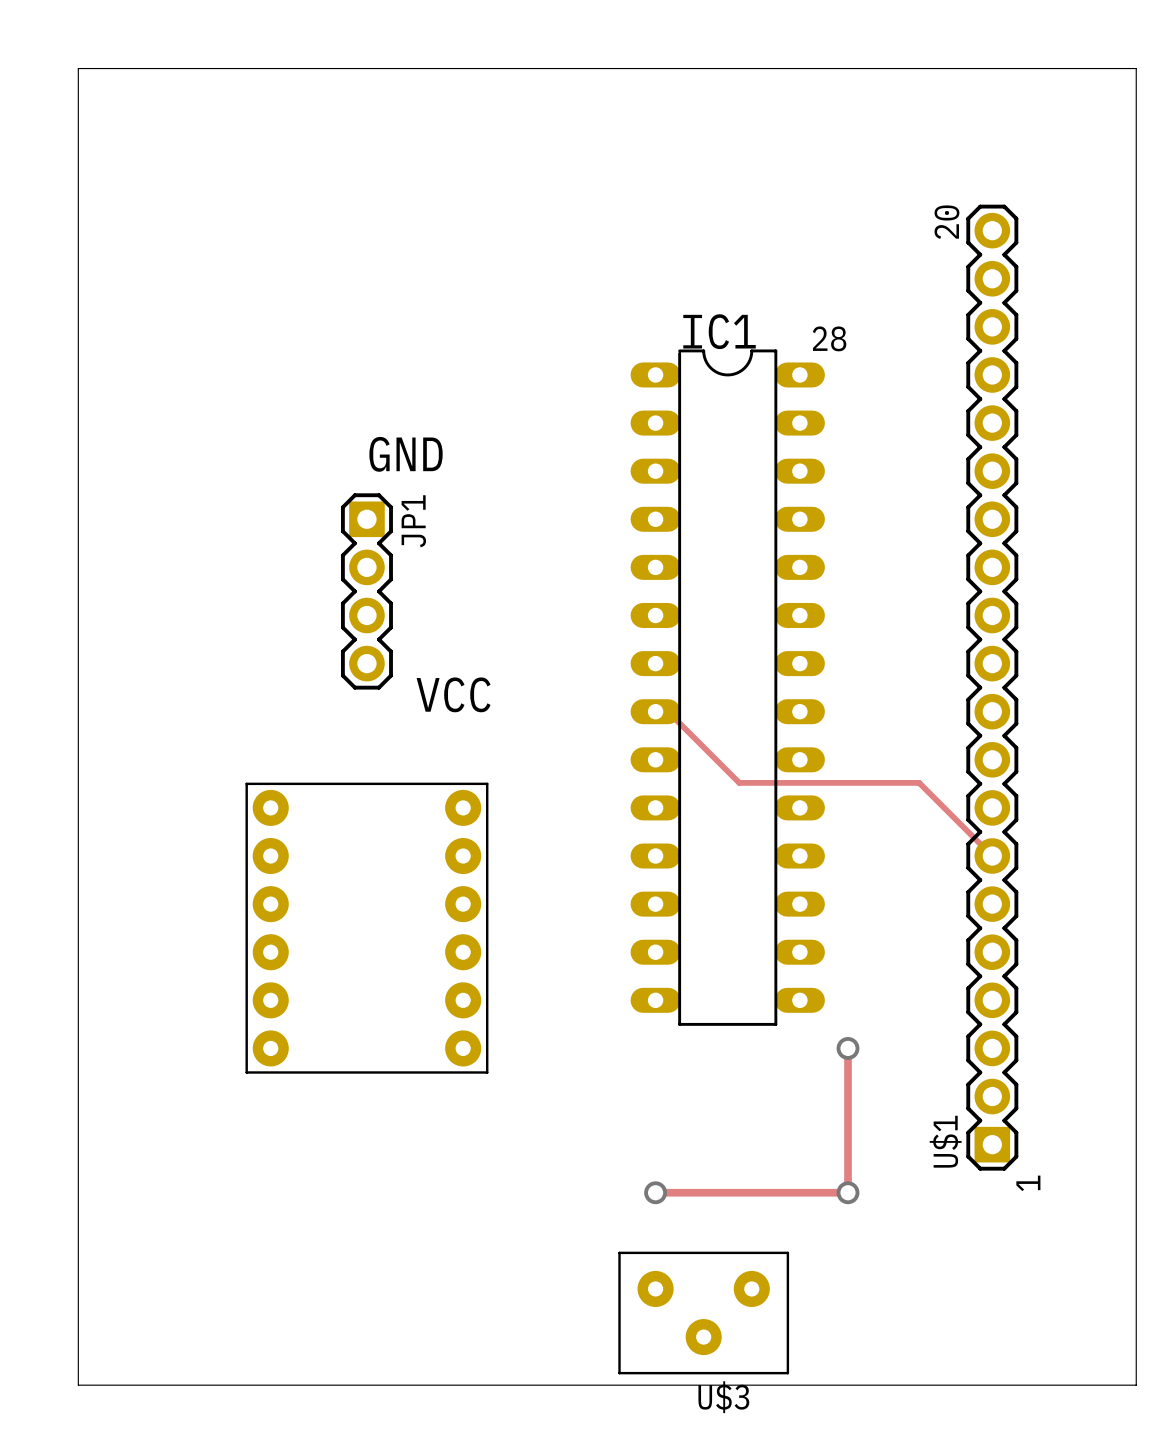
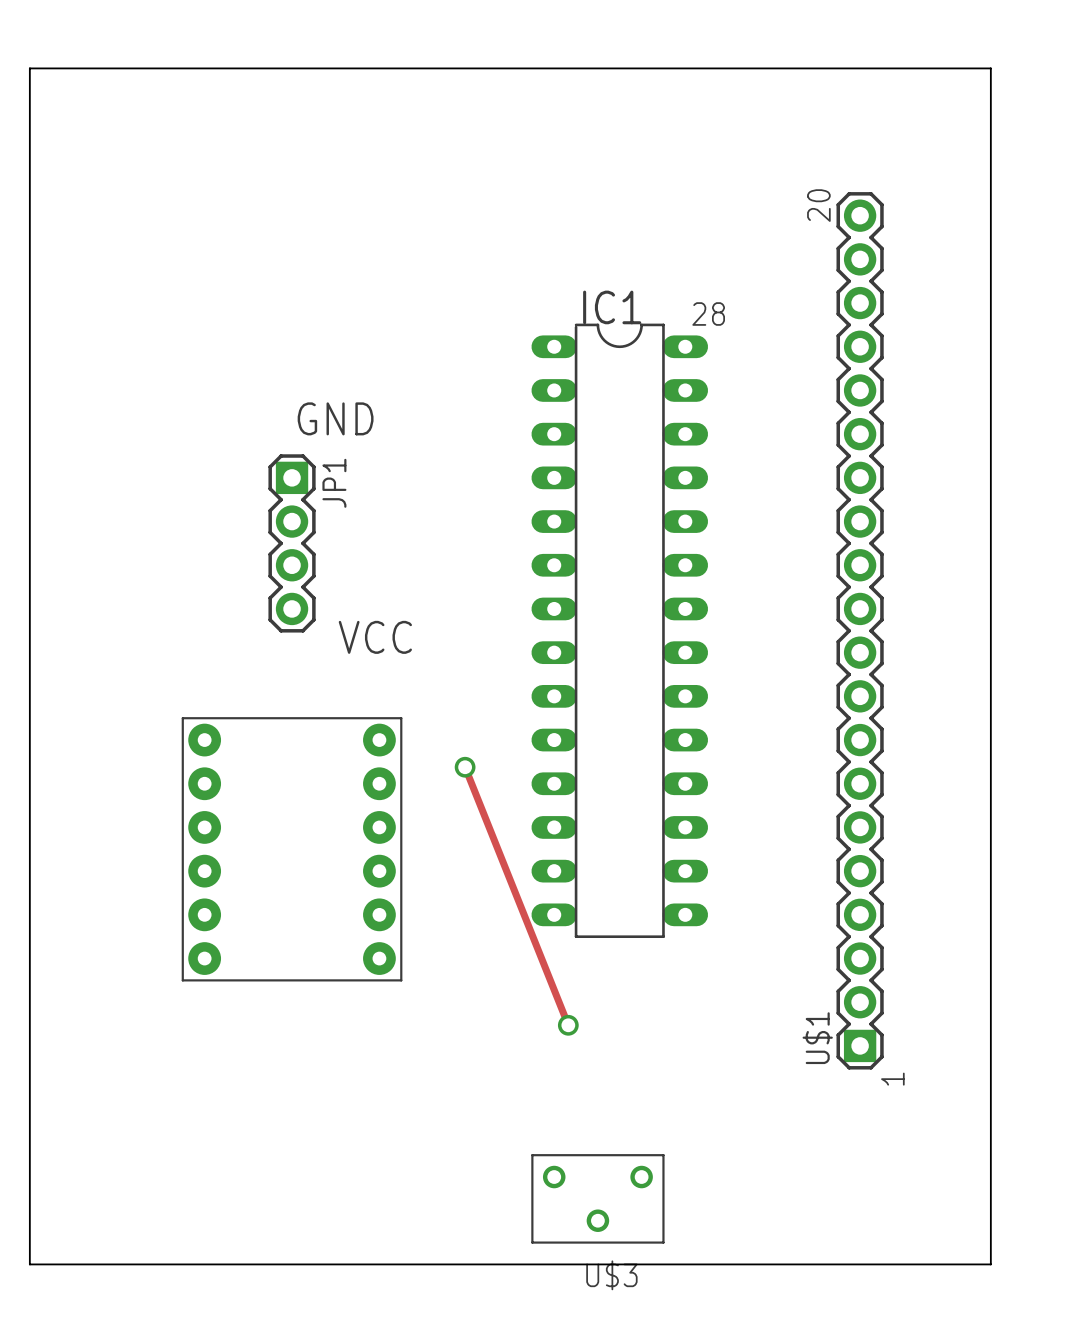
track: (655, 711) (668, 711) (739, 782) (919, 782) (992, 856) -> none
track: none -> (465, 767) (568, 1025)
via: none -> (465, 767)
track: (848, 1048) (848, 1192) (655, 1192) -> none
via: (848, 1048) -> none
via position: (655, 1192) -> (568, 1025)
via: (848, 1192) -> none
U$3 footprint: [618, 1251, 790, 1375] -> [531, 1154, 665, 1244]

